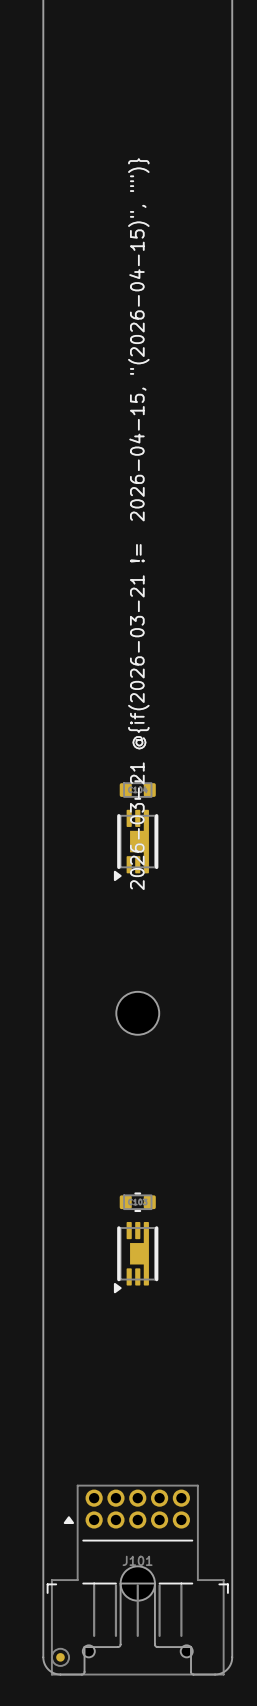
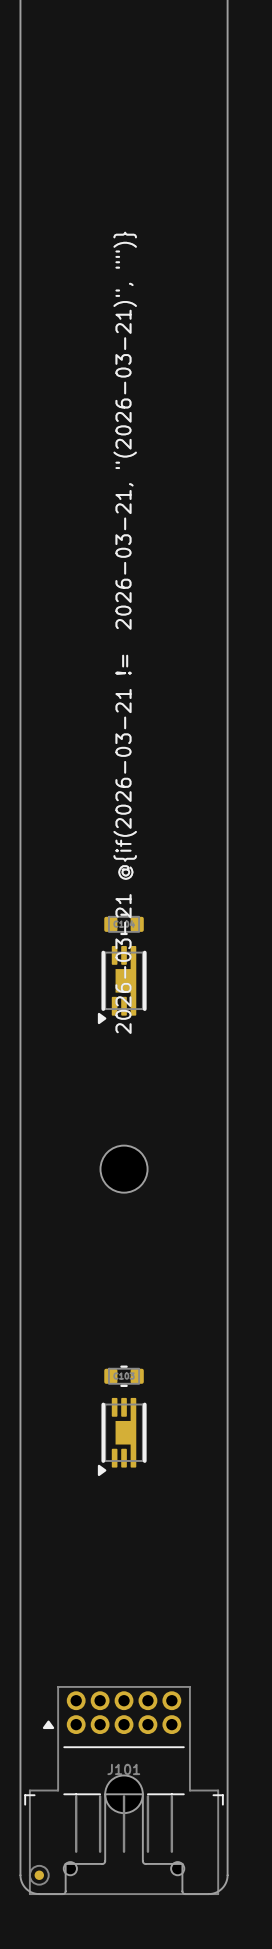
drawing shape: [128, 158, 150, 890] -> [113, 231, 137, 1034]

